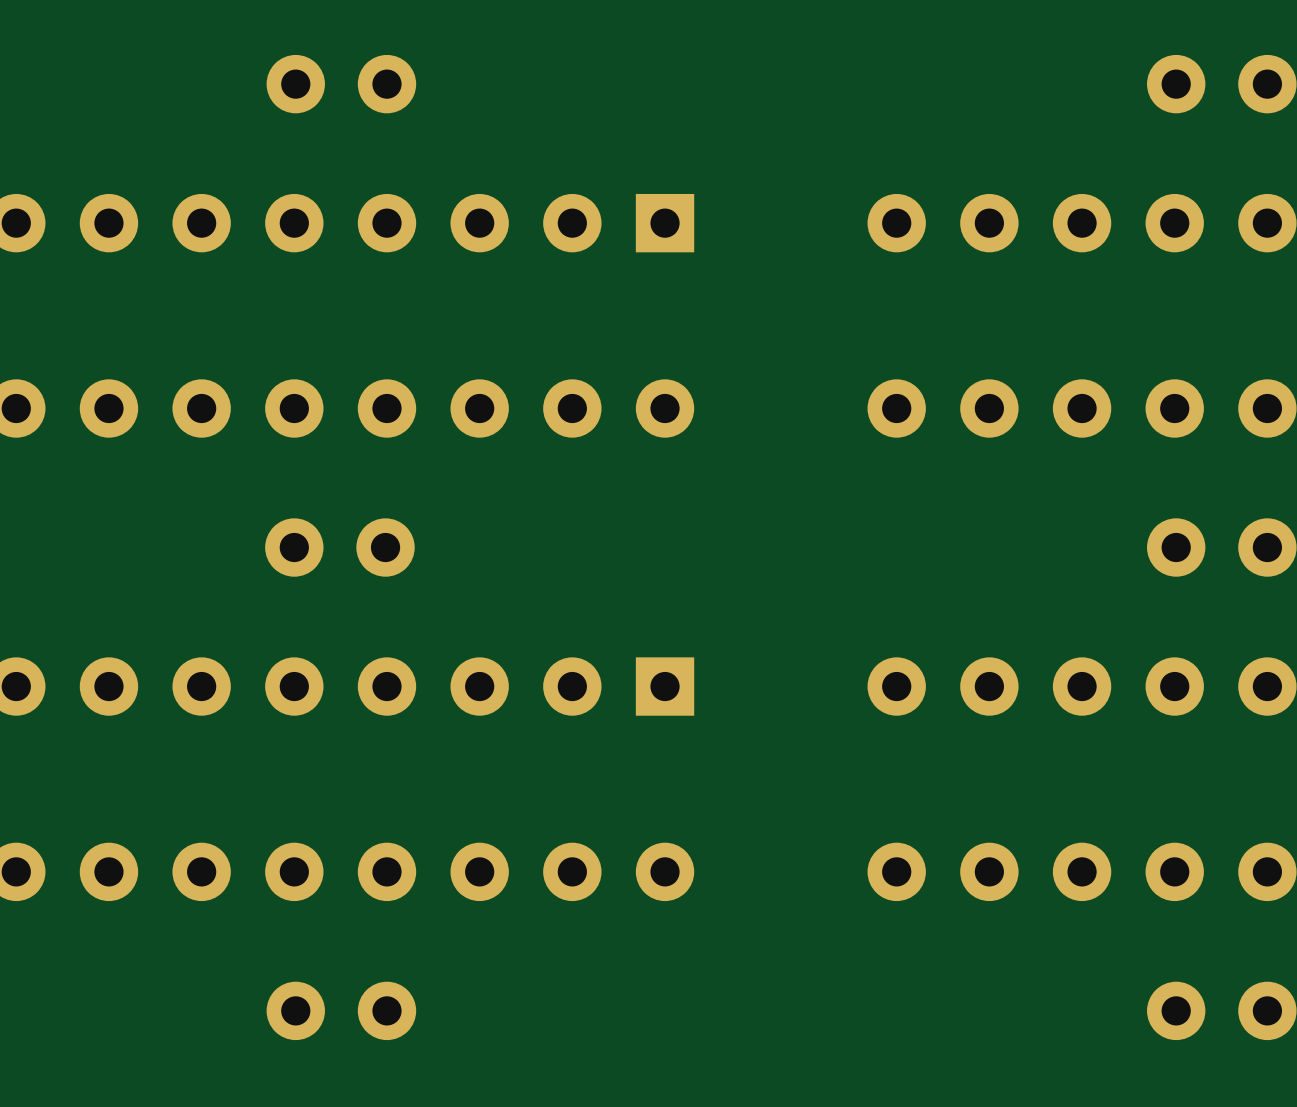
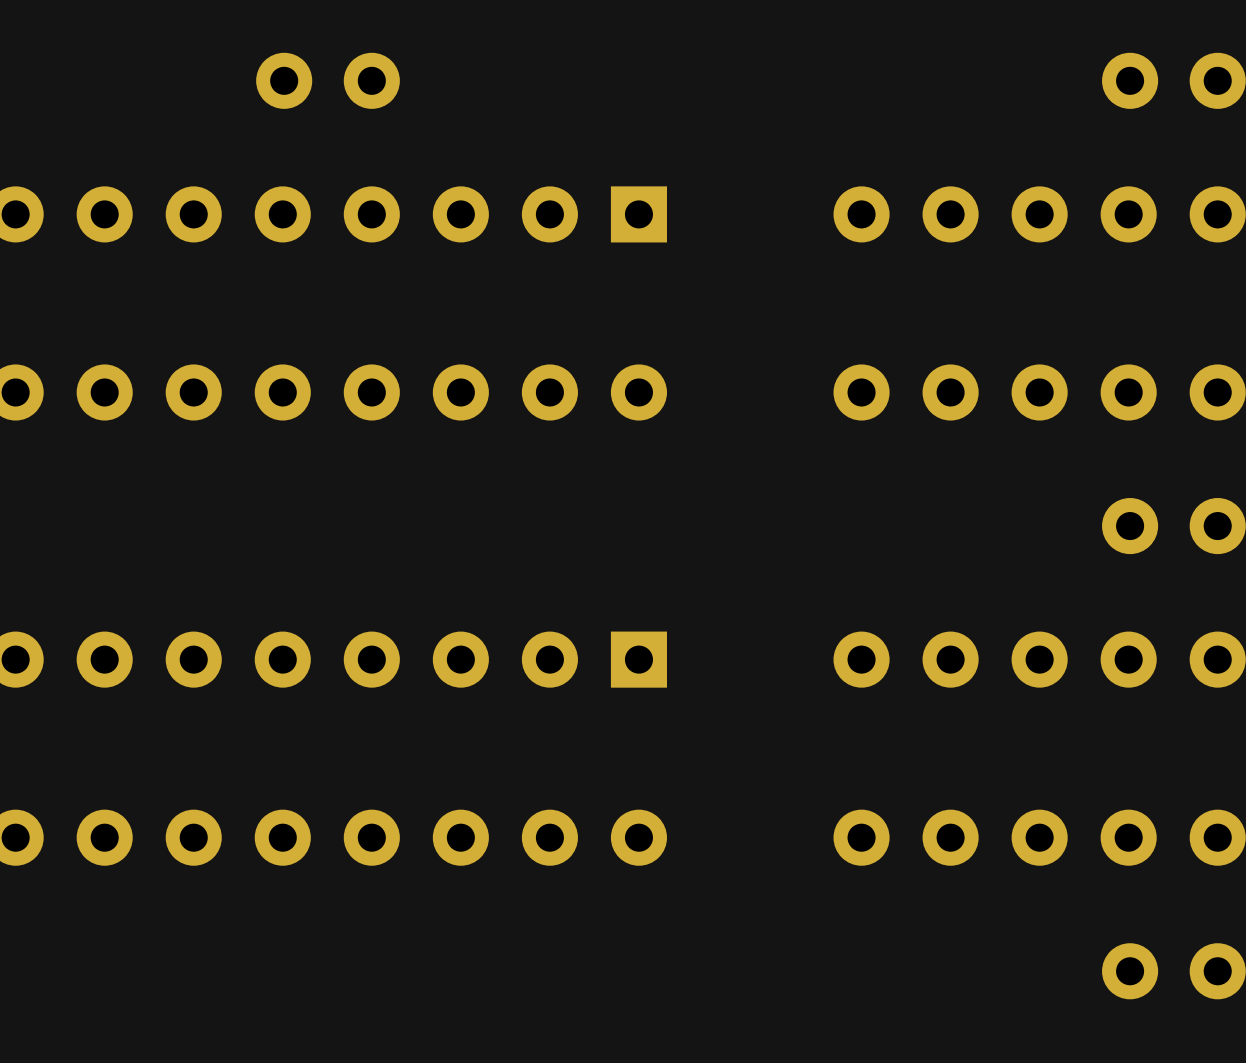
part: (339, 547) -> none
part: (341, 1010) -> none

